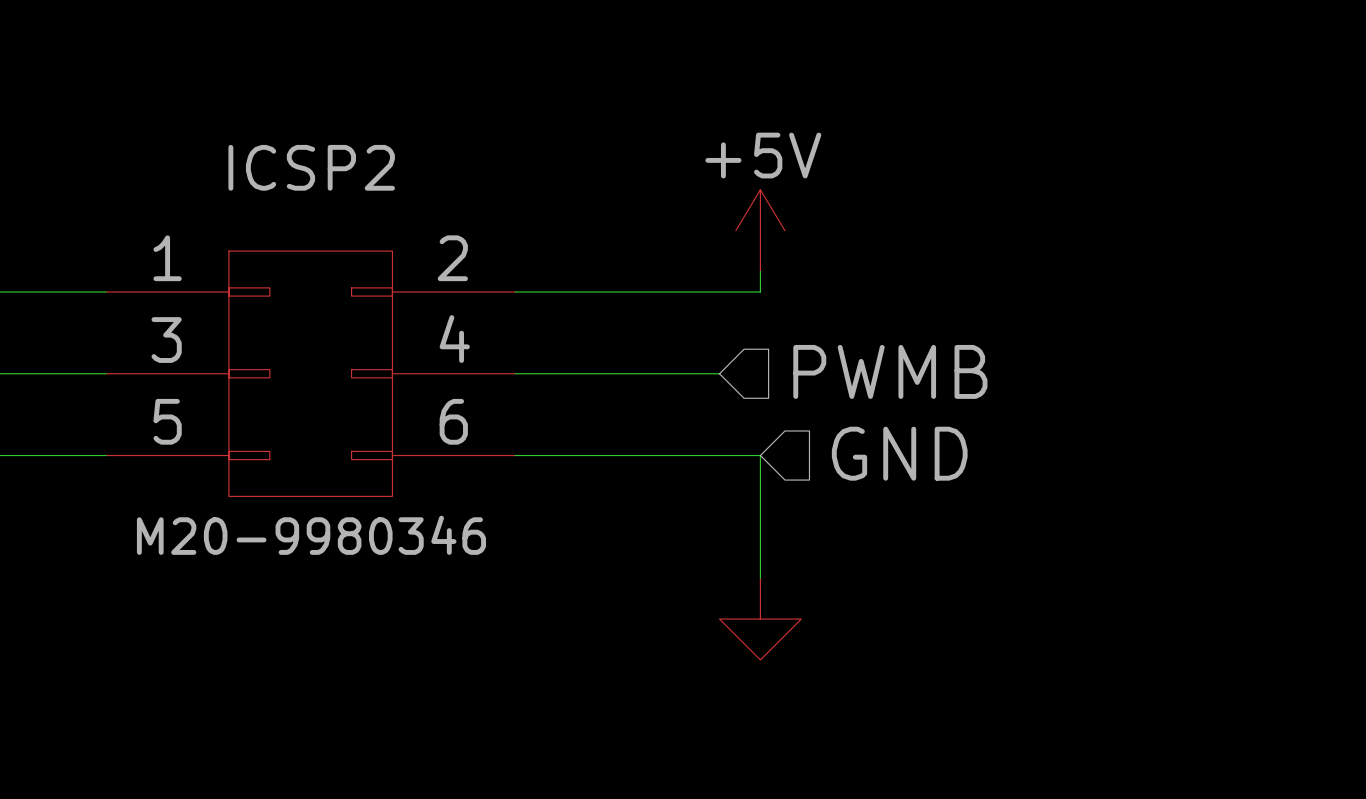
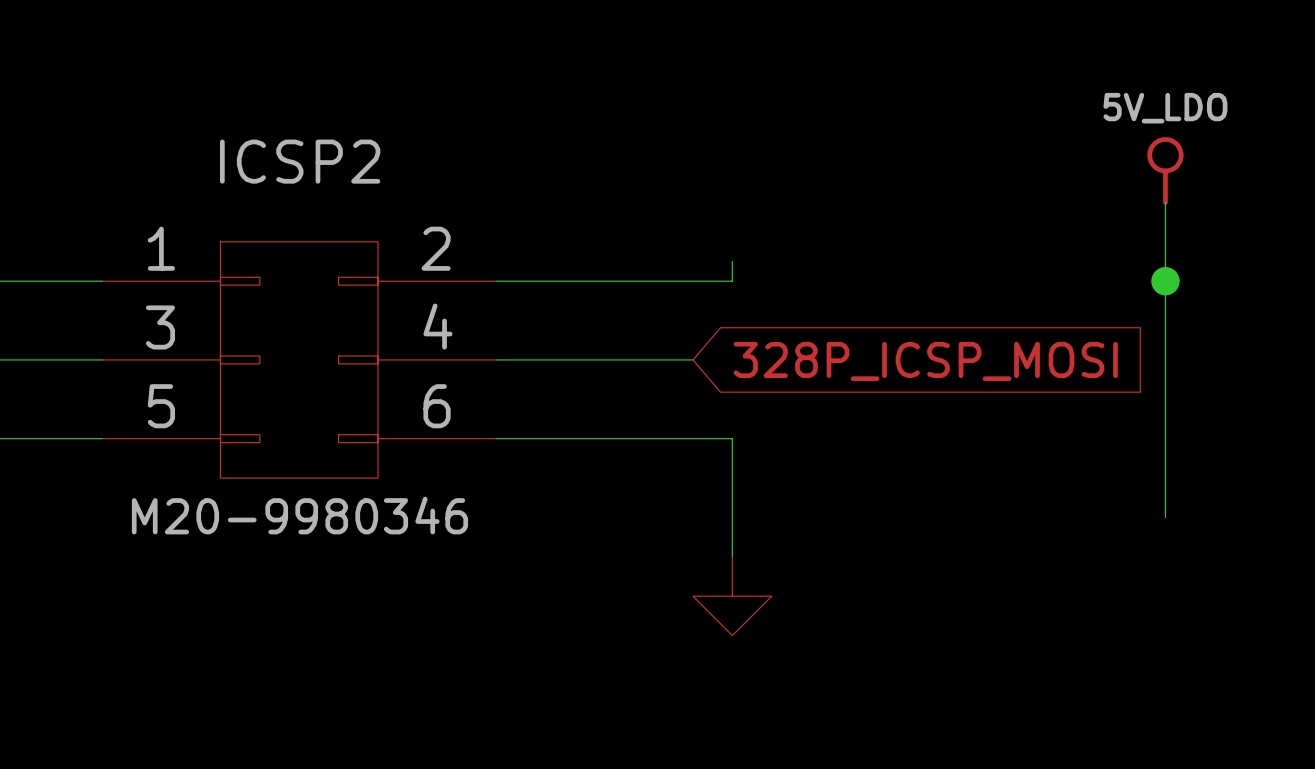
power symbol: none -> 5V_LDO (1165, 170)
wire: none -> (1165, 202) (1165, 517)
power symbol: +5V (760, 230) -> none
junction: none -> (1165, 281)
hierarchical label: PWMB (890, 371) -> none
global label: none -> 328P_ICSP_MOSI (925, 361)
hierarchical label: GND (899, 453) -> none

